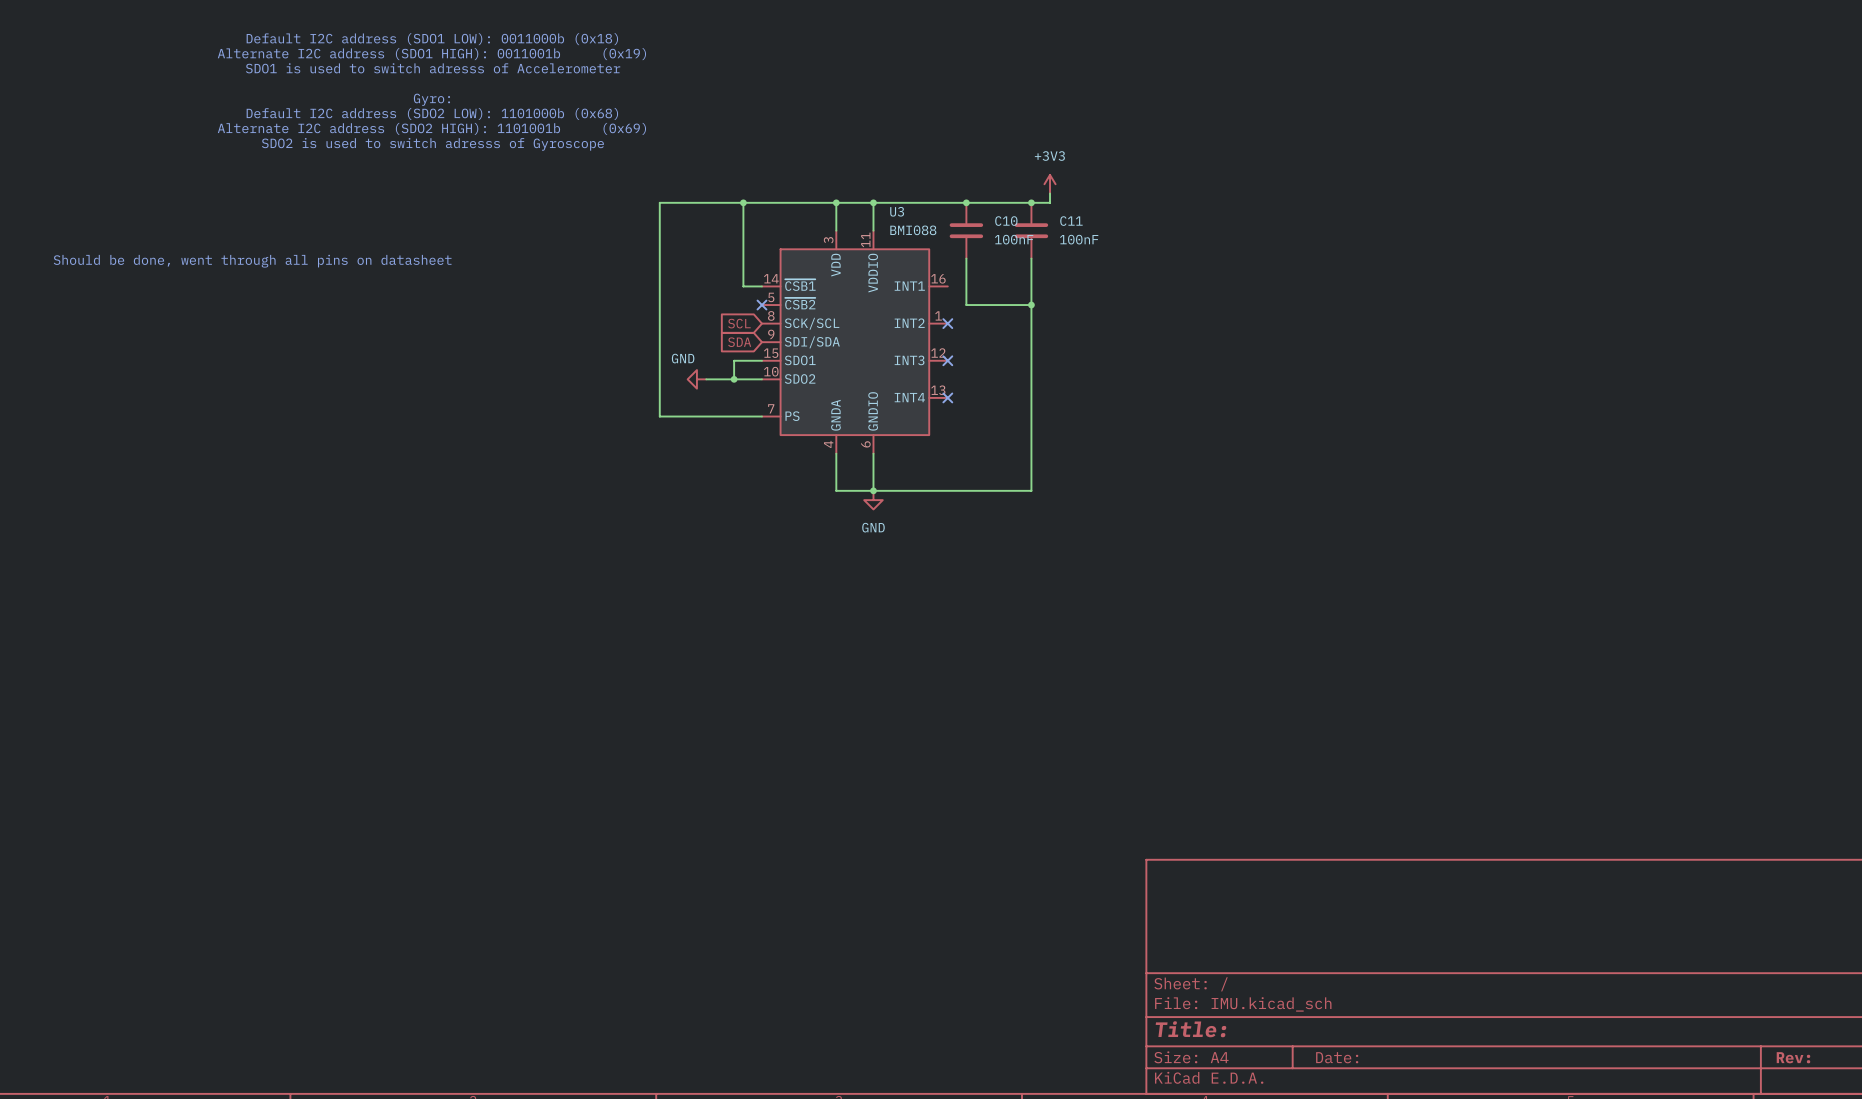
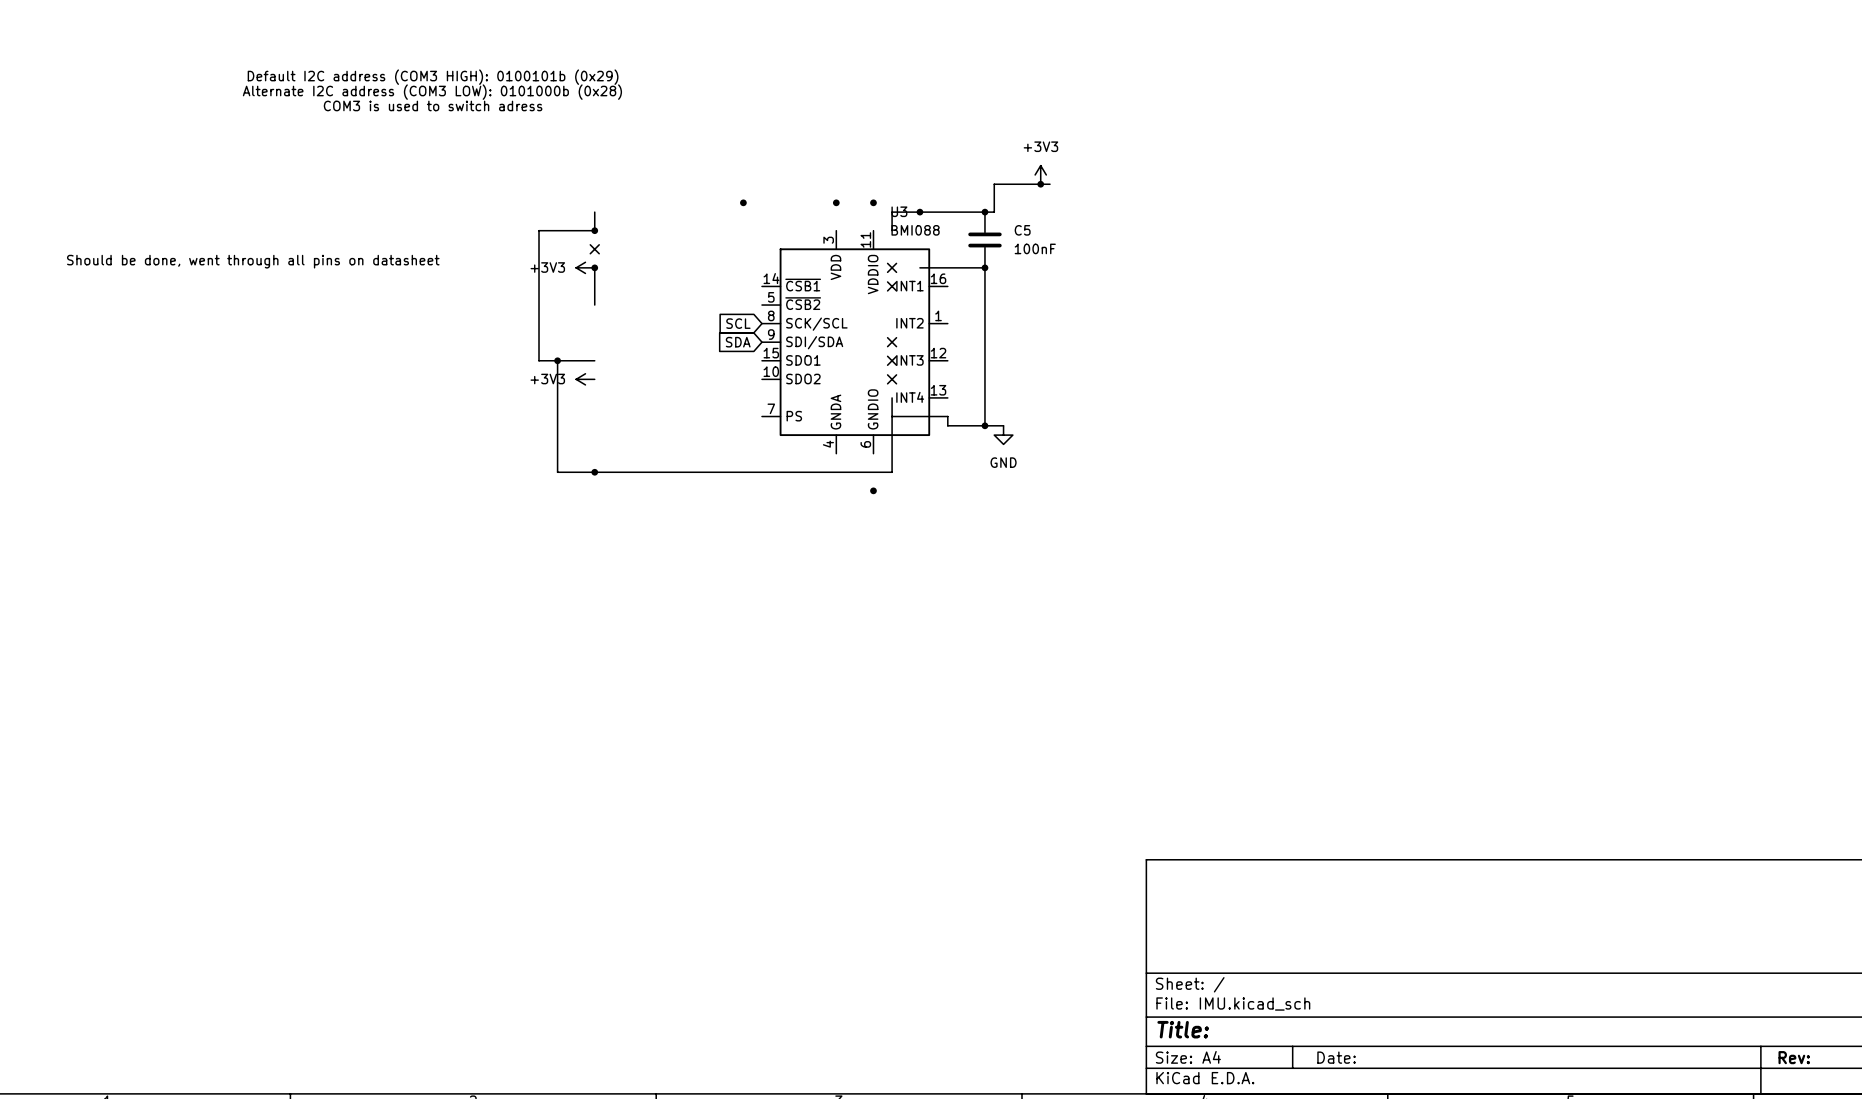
text: Default I2C address (SDO1 LOW): 0011000b (0x18) (432, 39) -> none
text: Alternate I2C address (SDO1 HIGH): 0011001b (0x19) (431, 54) -> none
text: SDO1 is used to switch adresss of Accelerometer (433, 68) -> none
text: none -> Default I2C address (COM3 HIGH): 0100101b (0x29) (433, 77)
text: none -> Alternate I2C address (COM3 LOW): 0101000b (0x28) (432, 92)
text: Gyro: (431, 99) -> none
text: none -> COM3 is used to switch adress (433, 105)
text: Default I2C address (SDO2 LOW): 1101000b (0x68) (432, 113) -> none
text: Alternate I2C address (SDO2 HIGH): 1101001b (0x69) (431, 128) -> none
text: SDO2 is used to switch adresss of Gyroscope (432, 144) -> none
wire: none -> (1050, 184) (994, 184) (994, 212) (892, 212) (892, 230)
power symbol position: +3V3 (1050, 184) -> +3V3 (1040, 174)
wire: (1050, 193) (1050, 202) (659, 202) (659, 416) (761, 416) -> none
wire: (743, 202) (743, 286) (761, 286) -> none
wire: (836, 202) (836, 230) -> none
wire: (873, 202) (873, 230) -> none
junction position: (966, 202) -> (984, 212)
junction position: (1031, 202) -> (1040, 184)
wire: none -> (594, 212) (594, 230) (539, 230) (539, 360) (594, 360)
junction: none -> (919, 212)
junction: none -> (594, 230)
C10: 100nF (966, 230) -> none
C11: 100nF (1031, 230) -> none
C5: none -> 100nF (984, 239)
no-connect mark: none -> (594, 249)
wire: (966, 258) (966, 305) (1031, 305) -> none
wire: (1031, 258) (1031, 490) (836, 490) (836, 453) -> none
power symbol: none -> +3V3 (585, 267)
wire: none -> (594, 267) (594, 305)
junction: none -> (594, 267)
no-connect mark: none -> (892, 267)
wire: none -> (919, 267) (984, 267) (984, 425)
junction: none -> (984, 267)
no-connect mark: none -> (892, 286)
no-connect mark: (761, 305) -> none
junction: (1031, 305) -> none
no-connect mark: (947, 323) -> none
no-connect mark: none -> (892, 342)
wire: none -> (557, 360) (557, 472) (892, 472) (892, 397)
junction: none -> (557, 360)
wire: (761, 360) (734, 360) (734, 379) -> none
no-connect mark: none -> (892, 360)
no-connect mark: (947, 360) -> none
power symbol: none -> +3V3 (585, 379)
power symbol: GND (696, 379) -> none
wire: (706, 379) (761, 379) -> none
junction: (734, 379) -> none
no-connect mark: none -> (892, 379)
no-connect mark: (947, 397) -> none
wire: none -> (892, 416) (947, 416) (947, 425) (1003, 425)
junction: none -> (984, 425)
wire: (873, 453) (873, 490) -> none
junction: none -> (594, 472)
power symbol position: GND (873, 500) -> GND (1003, 435)

